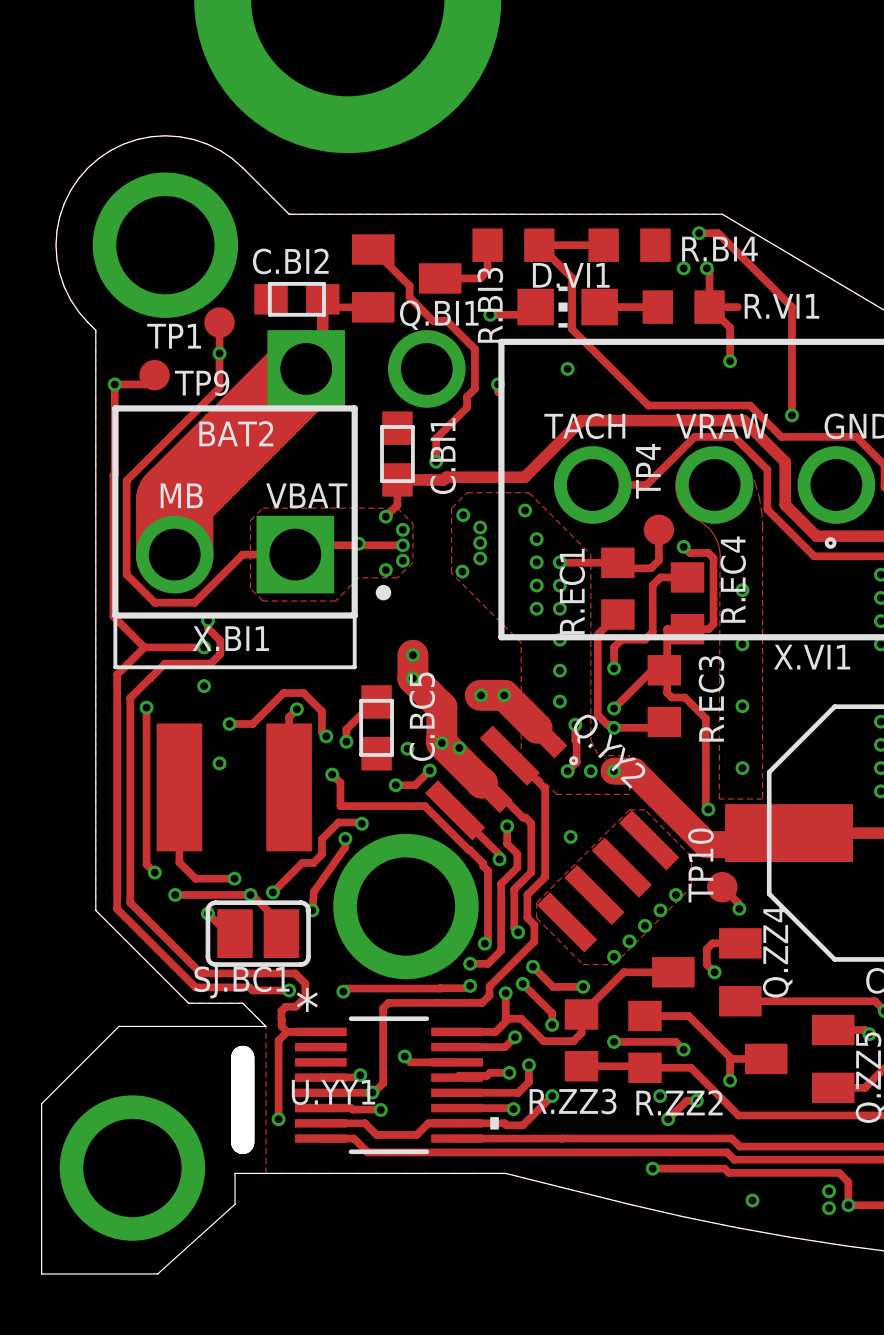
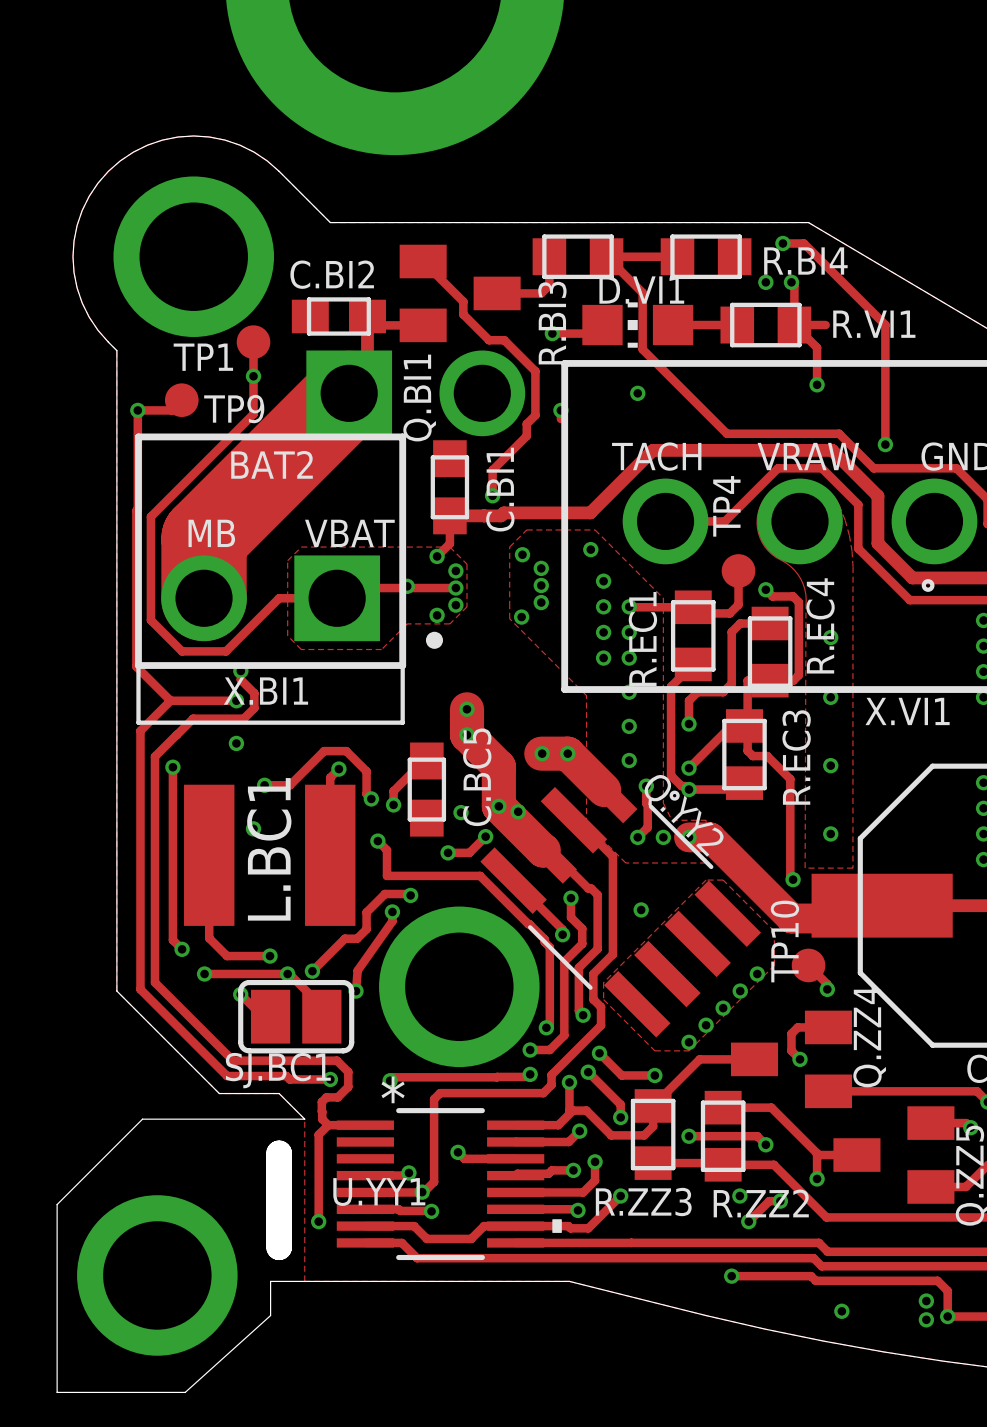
R.BI3 footprint: [472, 228, 555, 262] -> [532, 234, 624, 280]
R.BI4 footprint: [588, 228, 671, 262] -> [660, 234, 752, 280]
R.VI1 footprint: [642, 290, 725, 324] -> [720, 302, 812, 348]
Q.BI1 name rotation: 0° (439, 315) -> 90° counterclockwise (419, 398)
R.EC1 footprint: [601, 547, 635, 630] -> [670, 590, 716, 682]
R.EC4 footprint: [670, 562, 705, 645] -> [747, 606, 793, 698]
R.EC3 footprint: [647, 655, 682, 738] -> [722, 709, 767, 800]
Q.YY2 footprint: [425, 698, 680, 953] -> [480, 756, 762, 1038]
L.BC1 name: none -> L.BC1 (269, 849)
U.YY1 text position: * (307, 999) -> * (393, 1089)
R.ZZ3 footprint: [564, 999, 599, 1082] -> [630, 1089, 676, 1180]
R.ZZ2 footprint: [628, 1000, 662, 1084] -> [700, 1090, 746, 1182]

